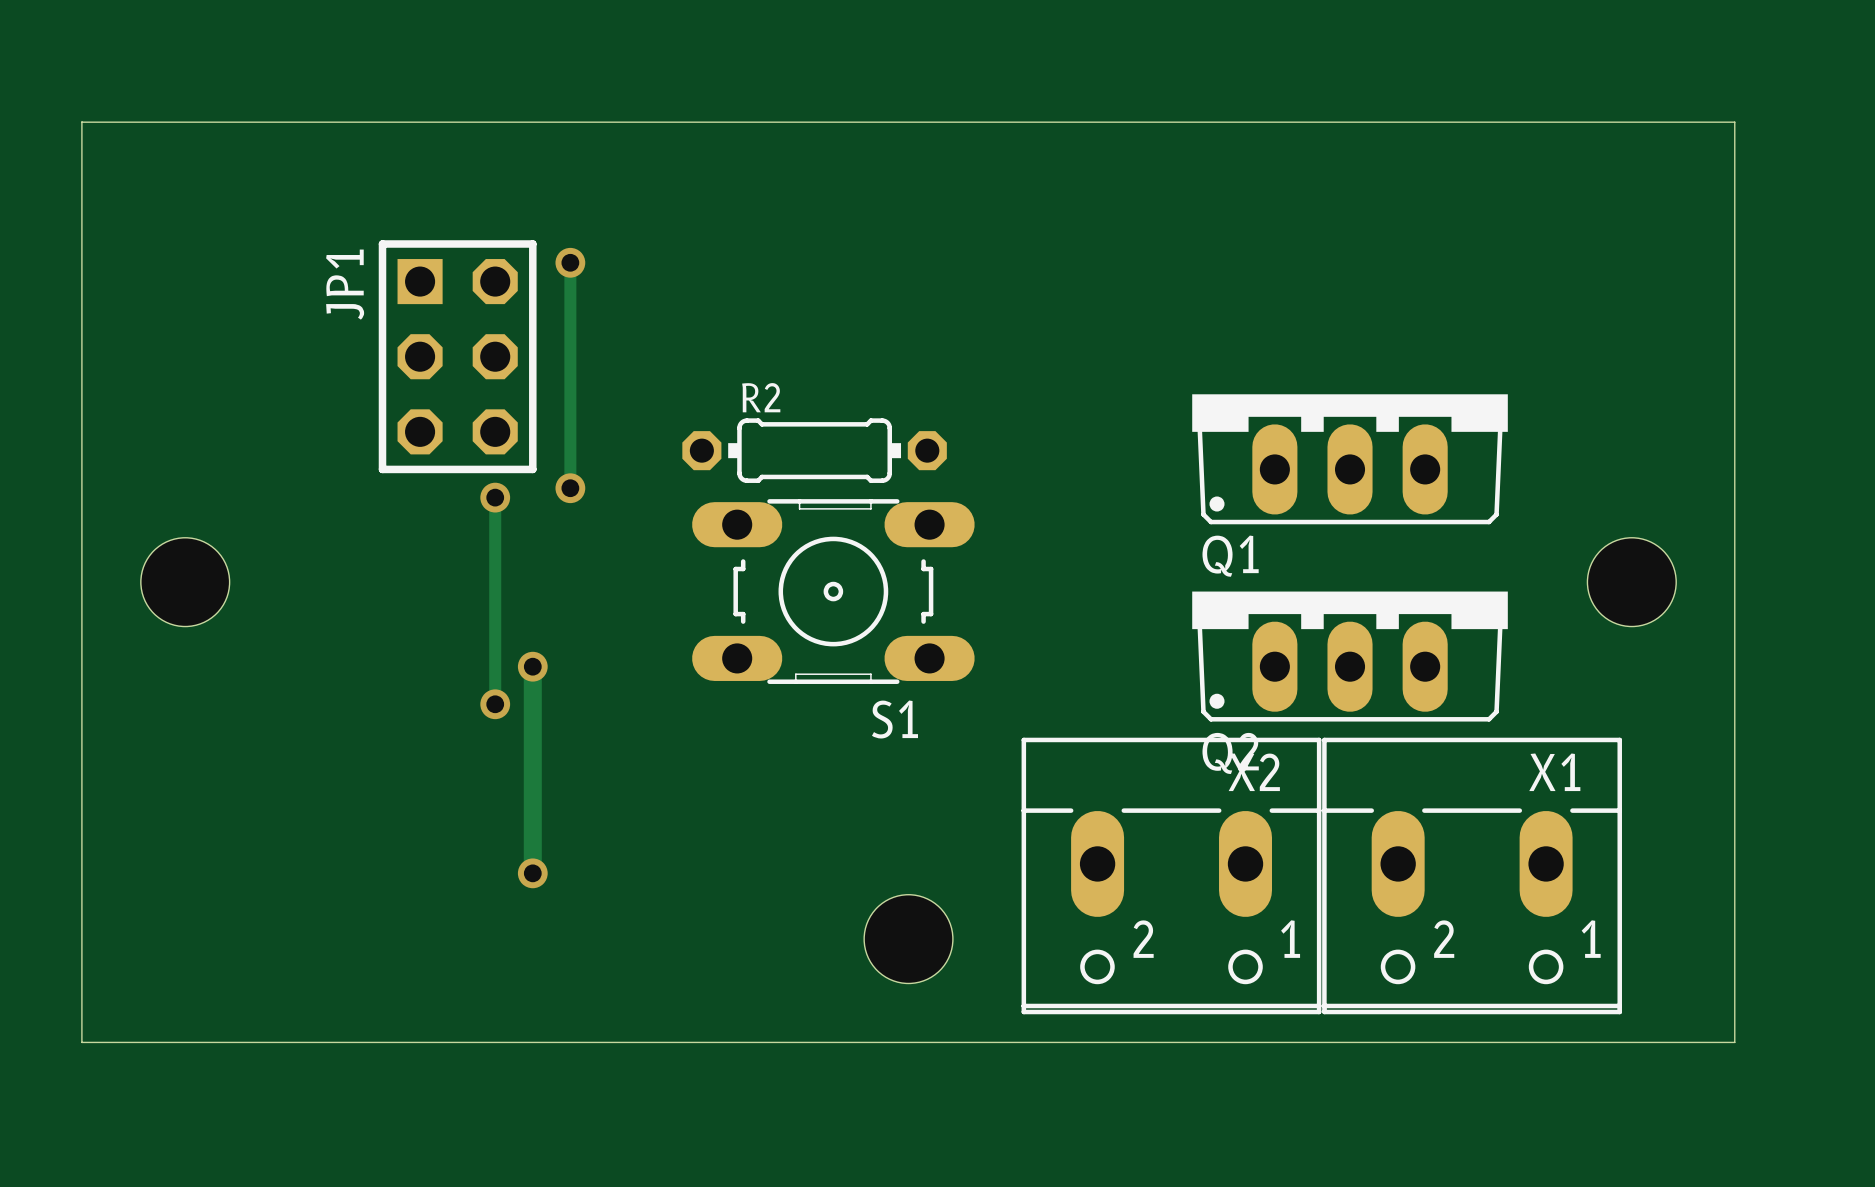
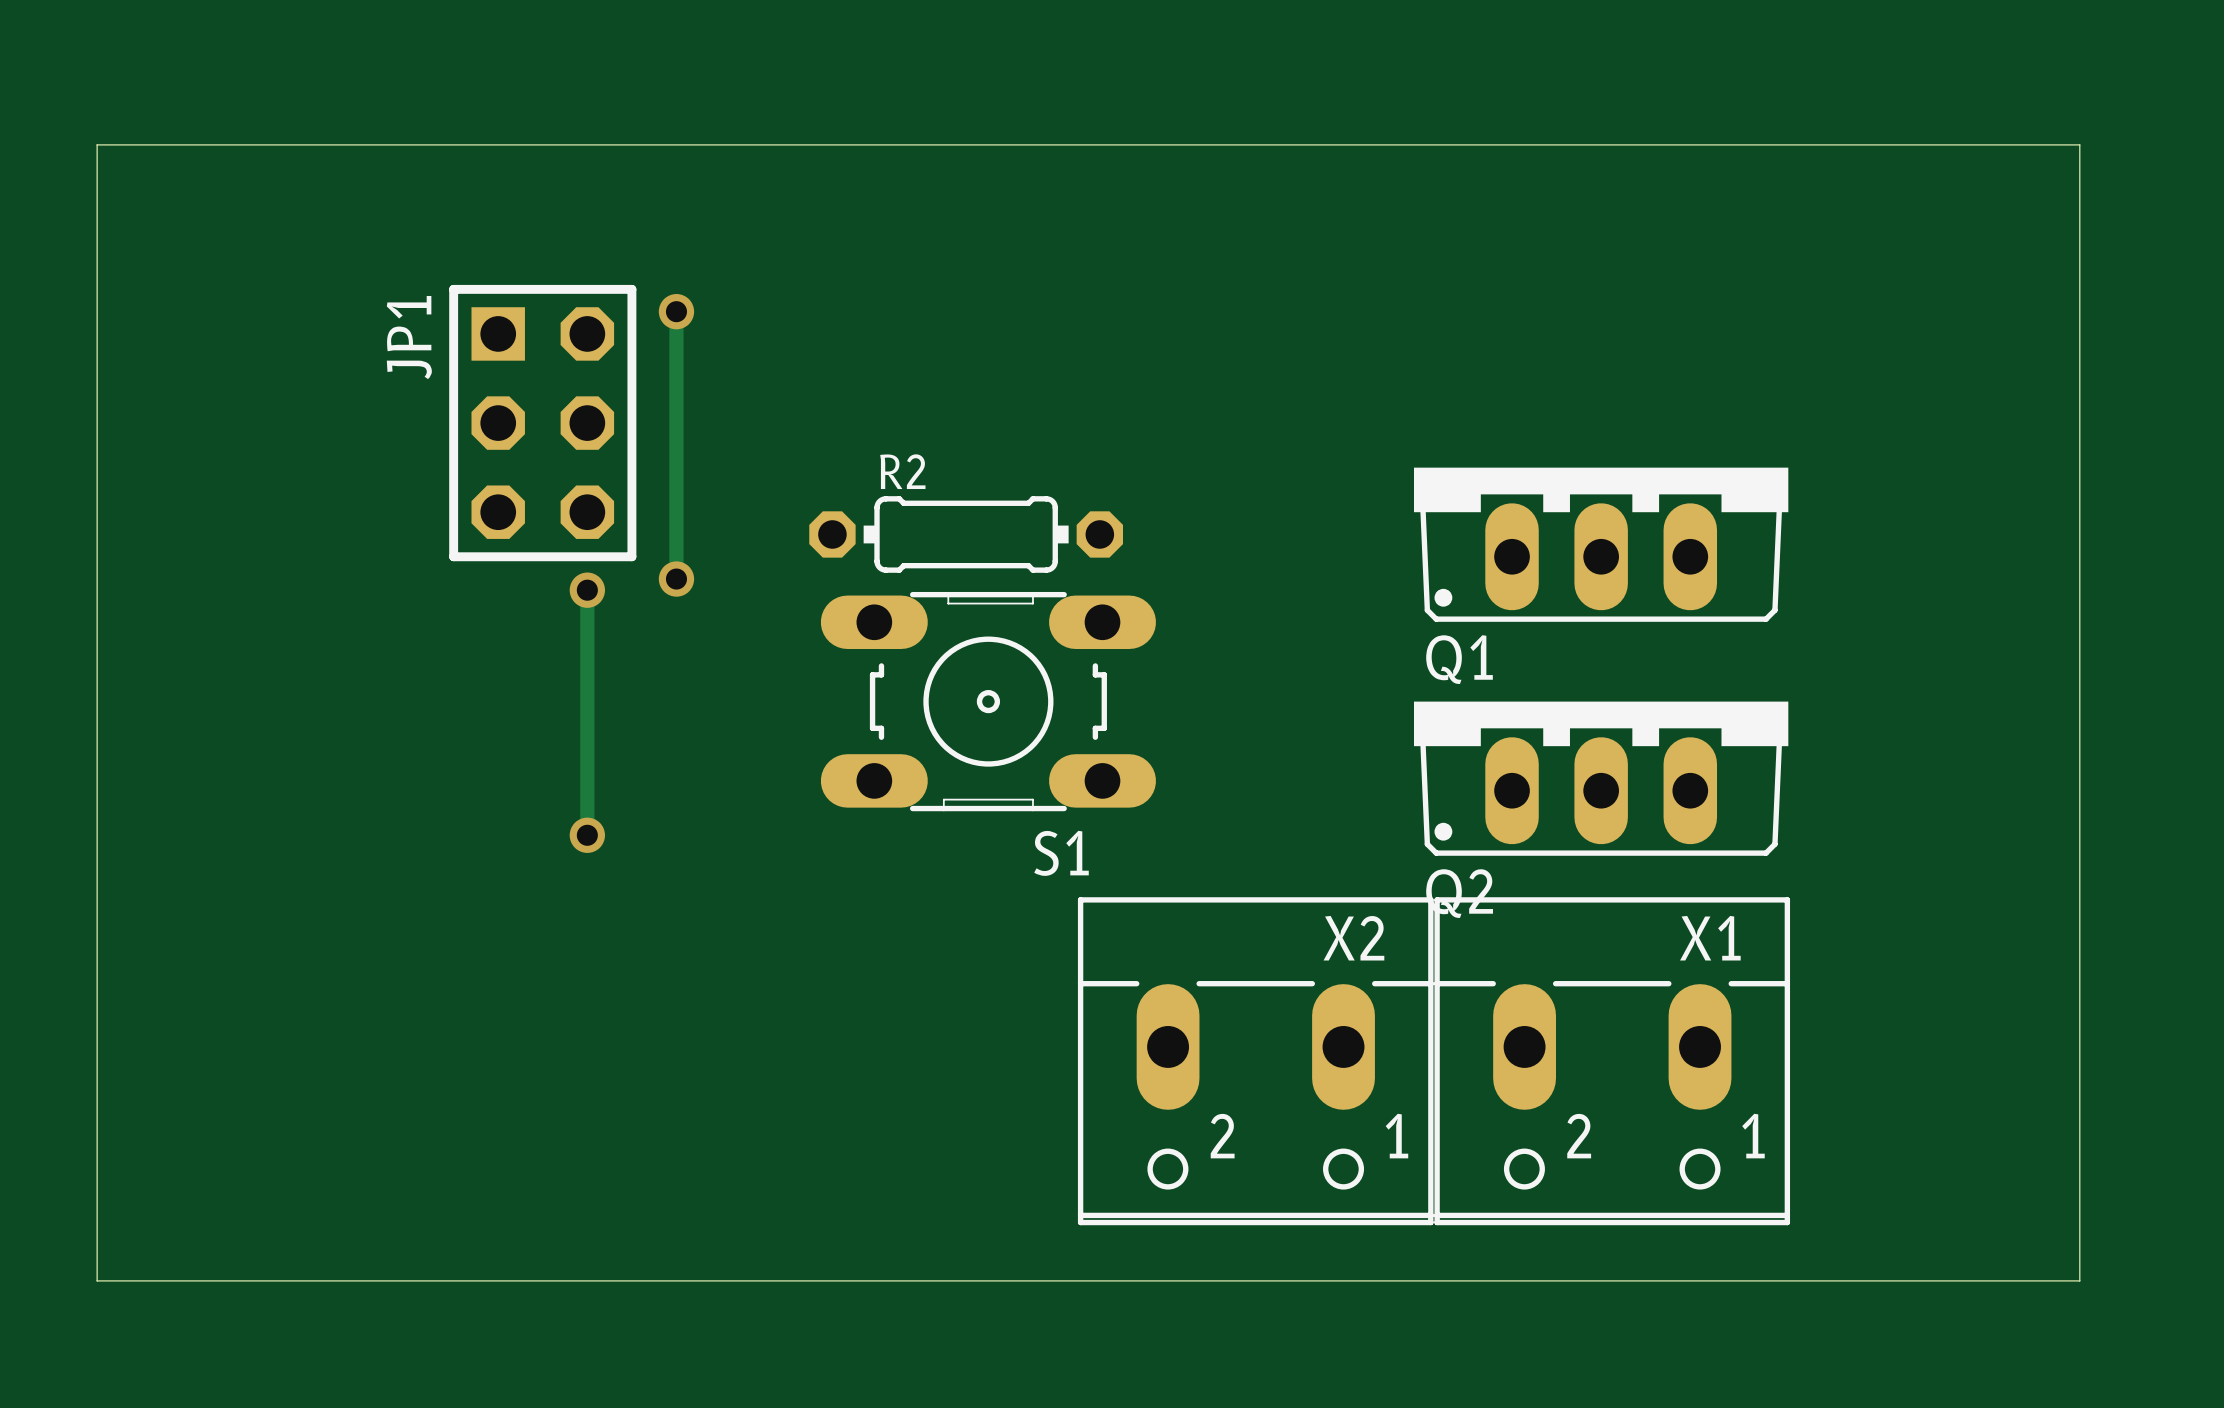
board edge: (1734, 122) (1734, 1042) (81, 1042) -> (2057, 144) (2079, 144) (2079, 1280) (97, 1280) (97, 1236)
hole: (185, 582) -> none
hole: (1631, 582) -> none
track: (532, 666) (532, 873) -> none
via: (532, 666) -> none
X2 footprint: [1021, 737, 1322, 1015] -> [1077, 897, 1434, 1226]
X1 footprint: [1322, 737, 1622, 1015] -> [1434, 897, 1791, 1226]
via: (532, 873) -> none
hole: (908, 939) -> none

